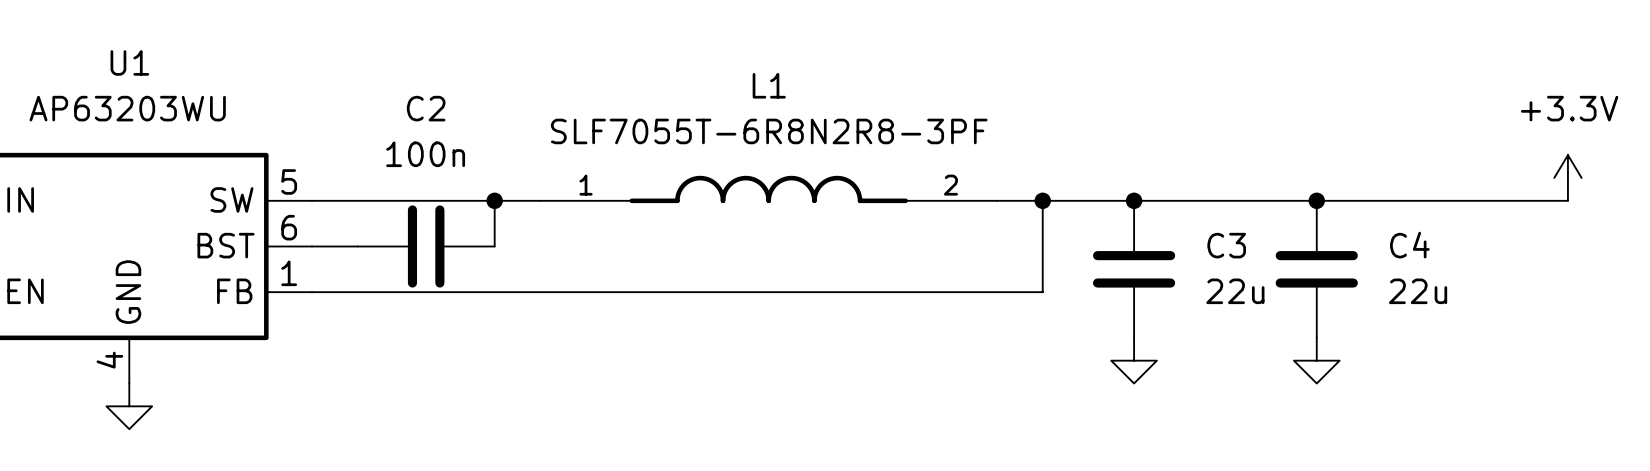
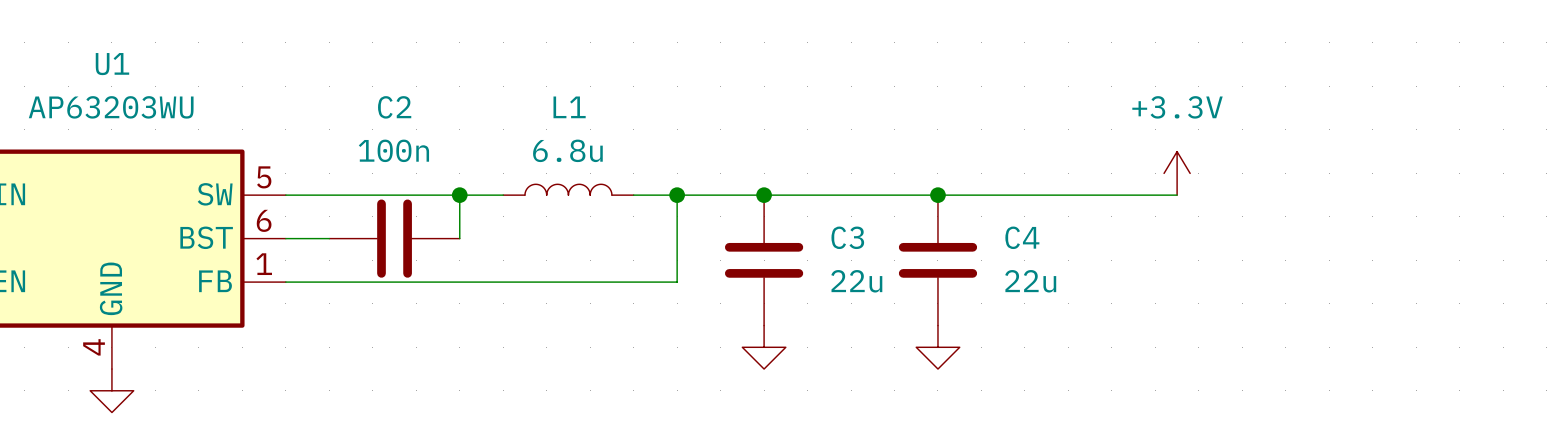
L1 value: SLF7055T-6R8N2R8-3PF (769, 131) -> 6.8u (567, 150)
L1 symbol: [540, 175, 998, 204] -> [503, 184, 634, 196]
power symbol position: +3.3V (1567, 177) -> +3.3V (1177, 173)
wire: none -> (633, 195) (937, 195)
junction: none -> (677, 195)
junction: none -> (764, 195)
wire: (1042, 200) (1042, 292) (723, 292) -> (677, 195) (677, 282)
junction position: (1042, 200) -> (937, 195)
junction: (1134, 200) -> none
wire: (1248, 200) (1567, 200) -> none
junction: (1316, 200) -> none
C3 position: (1134, 269) -> (764, 260)
C4 position: (1316, 269) -> (937, 260)
power symbol: none -> (764, 347)
power symbol position: (1134, 360) -> (937, 347)
power symbol: (1316, 360) -> none

